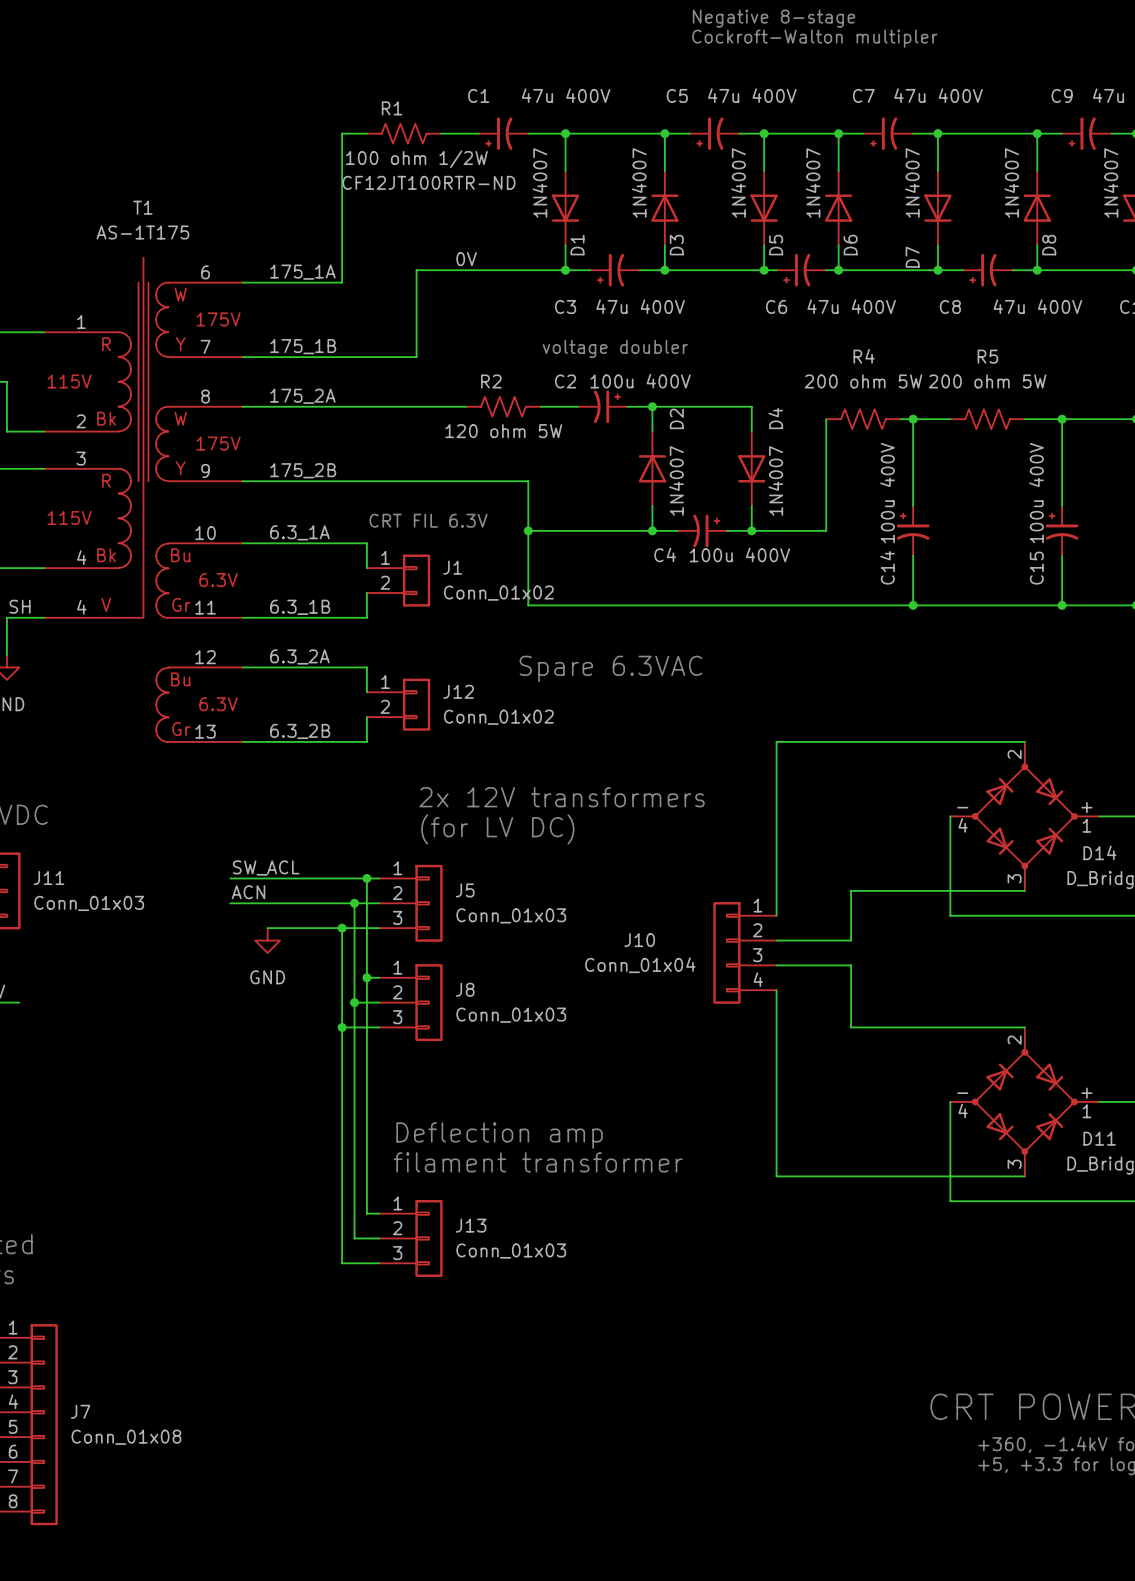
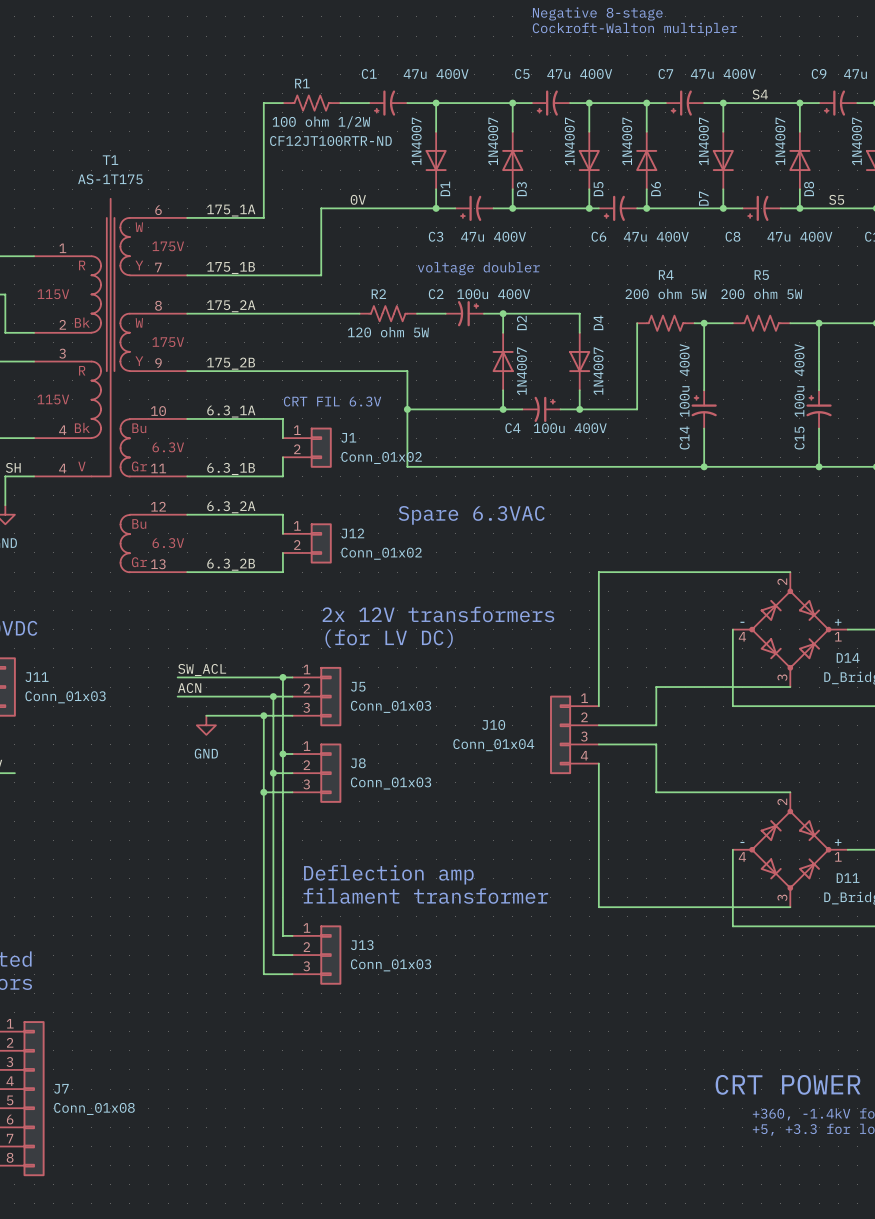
label: none -> S4 (760, 94)
label: none -> S5 (836, 199)

